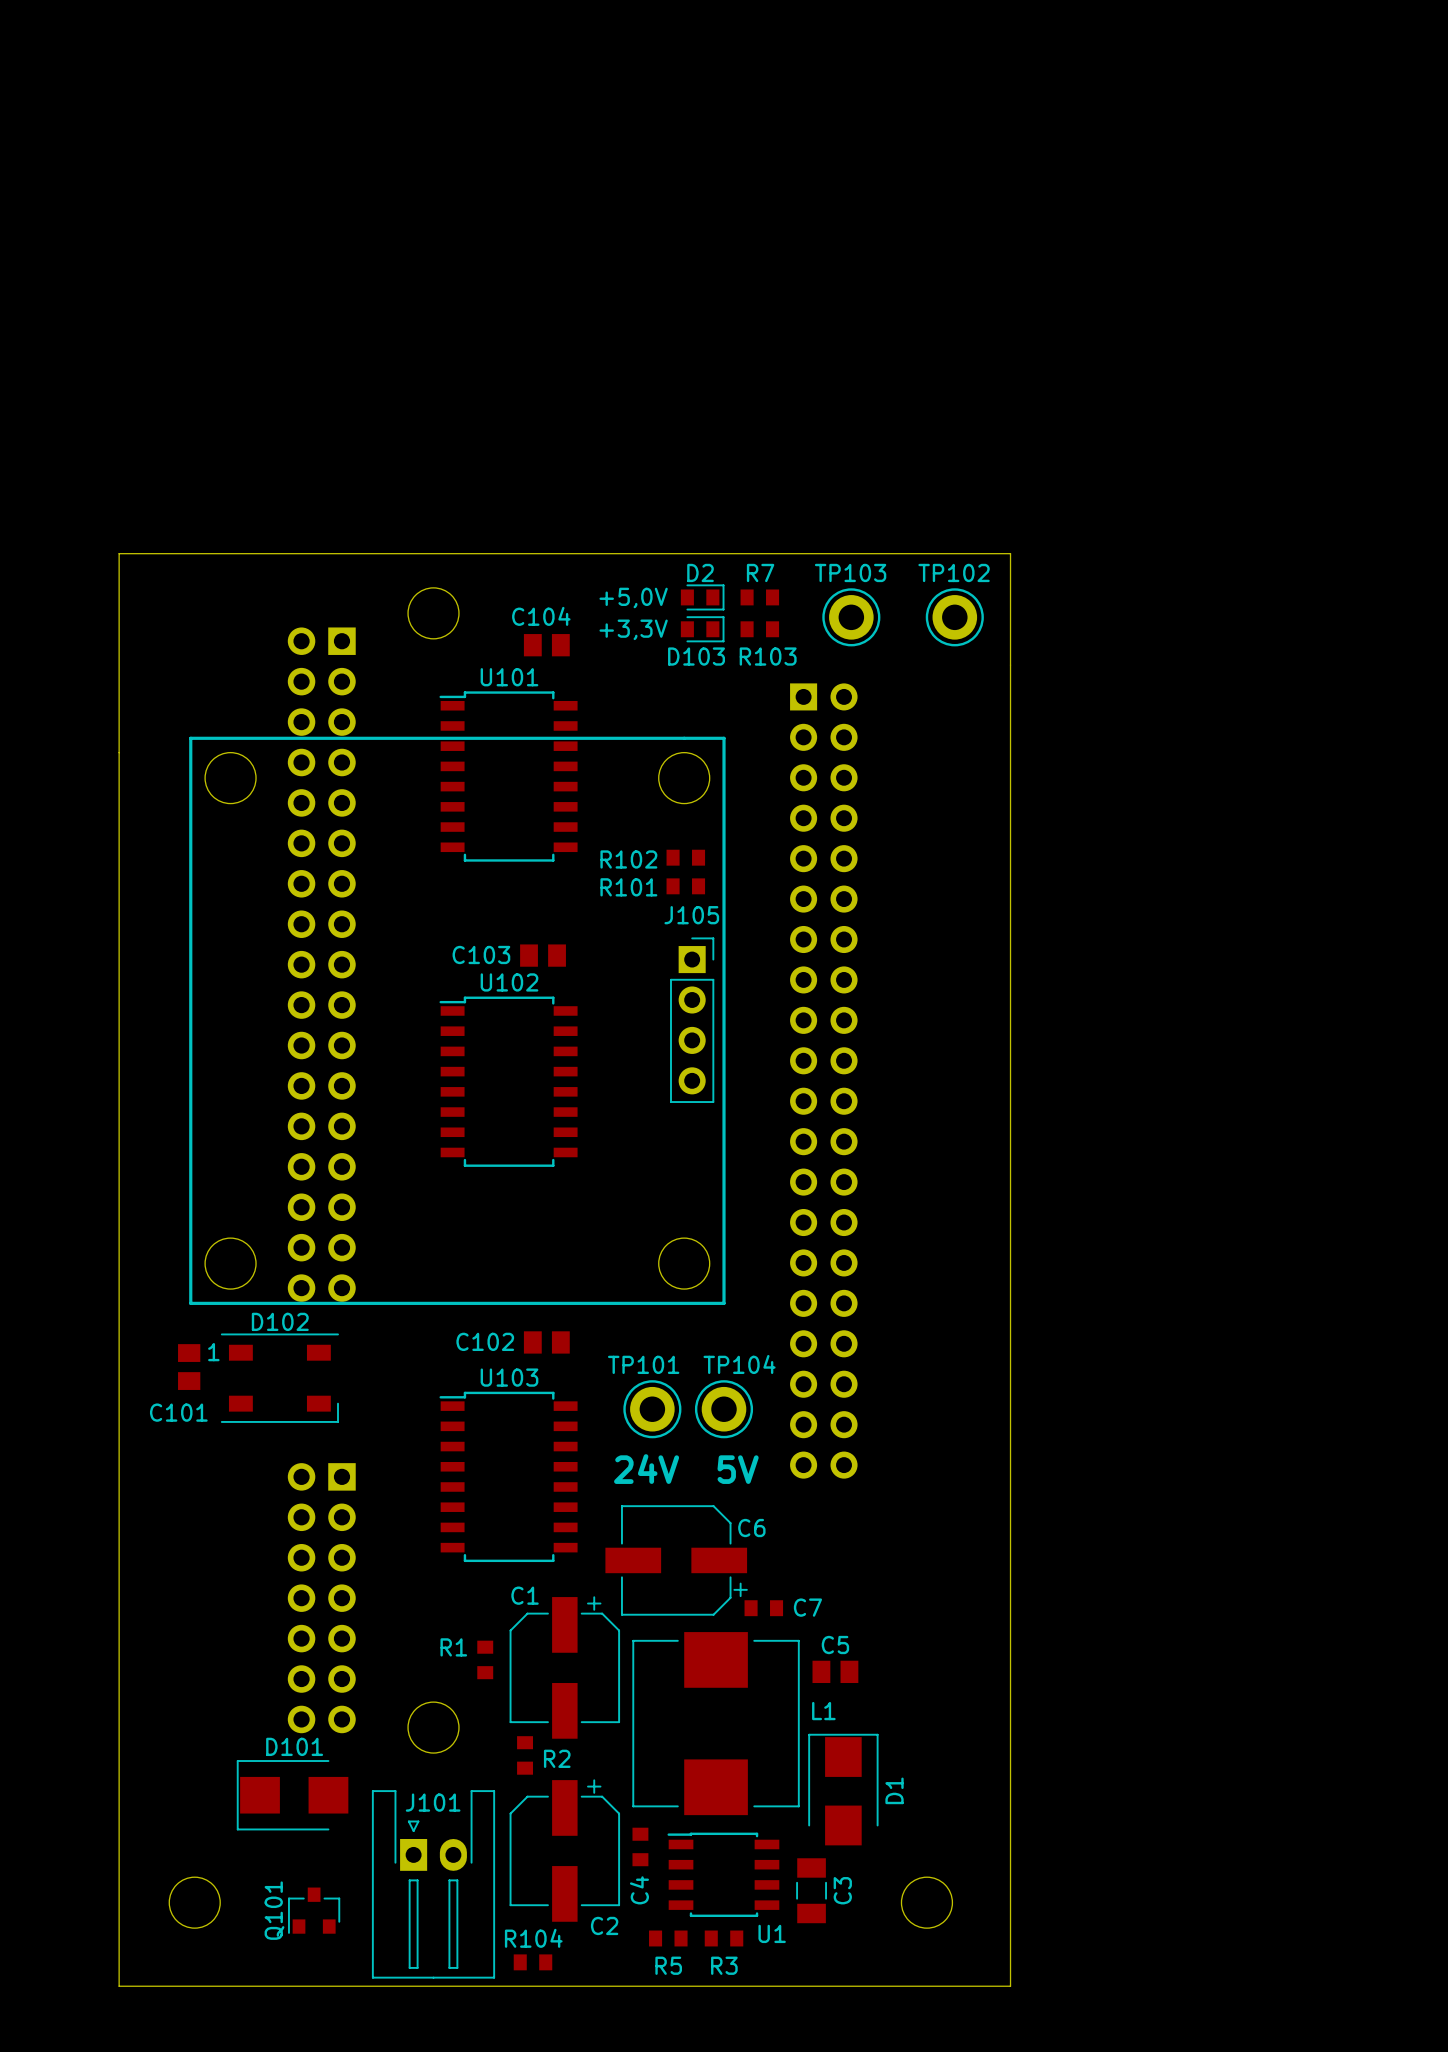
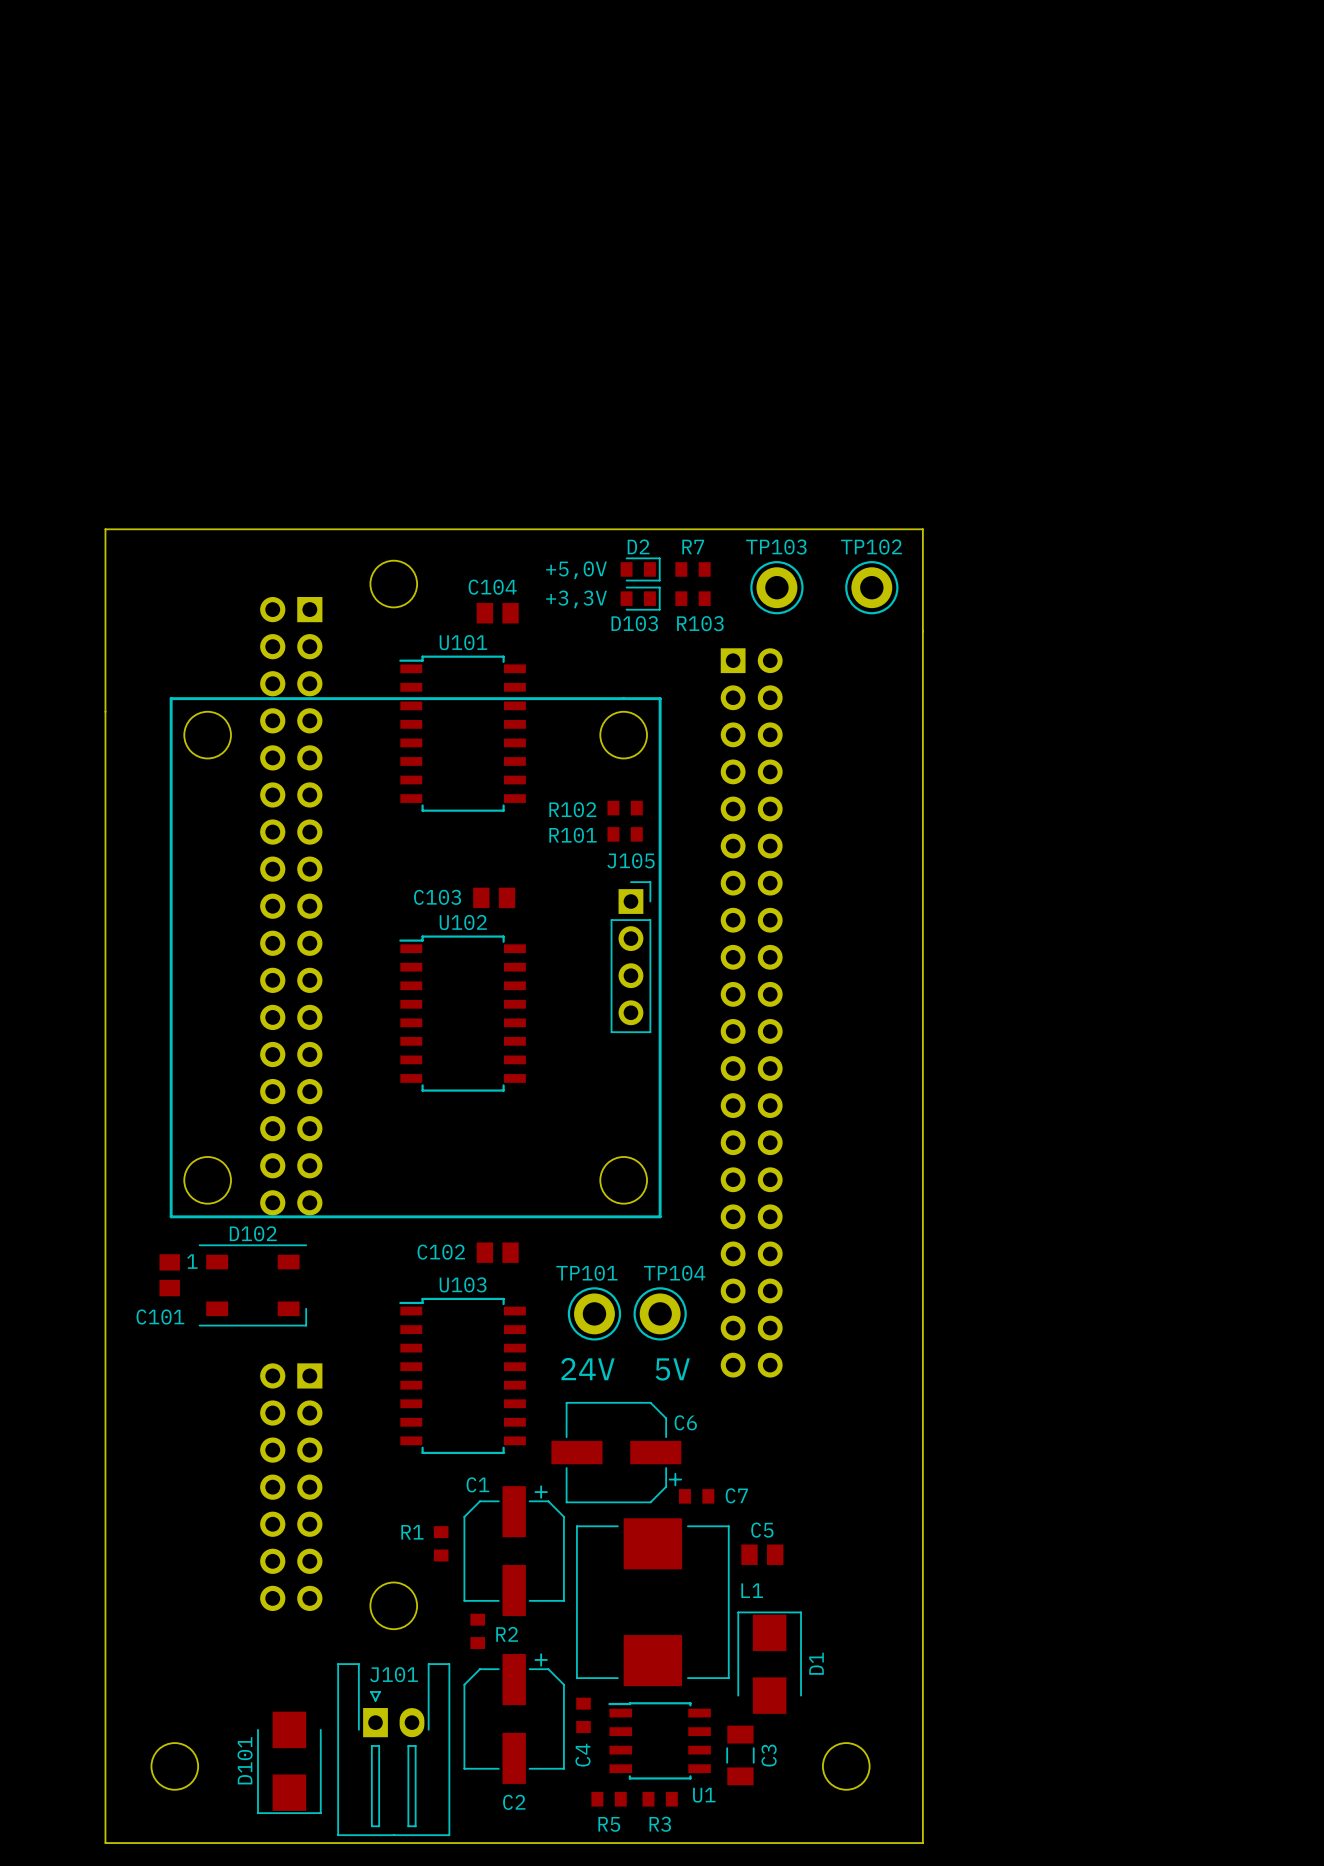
D101 rotation: 0° (292, 1795) -> 90° counterclockwise (289, 1762)
D101 position: (292, 1795) -> (289, 1762)
Q101: (314, 1910) -> none
C2 name position: C2 (604, 1925) -> C2 (514, 1802)
R104: (532, 1962) -> none

